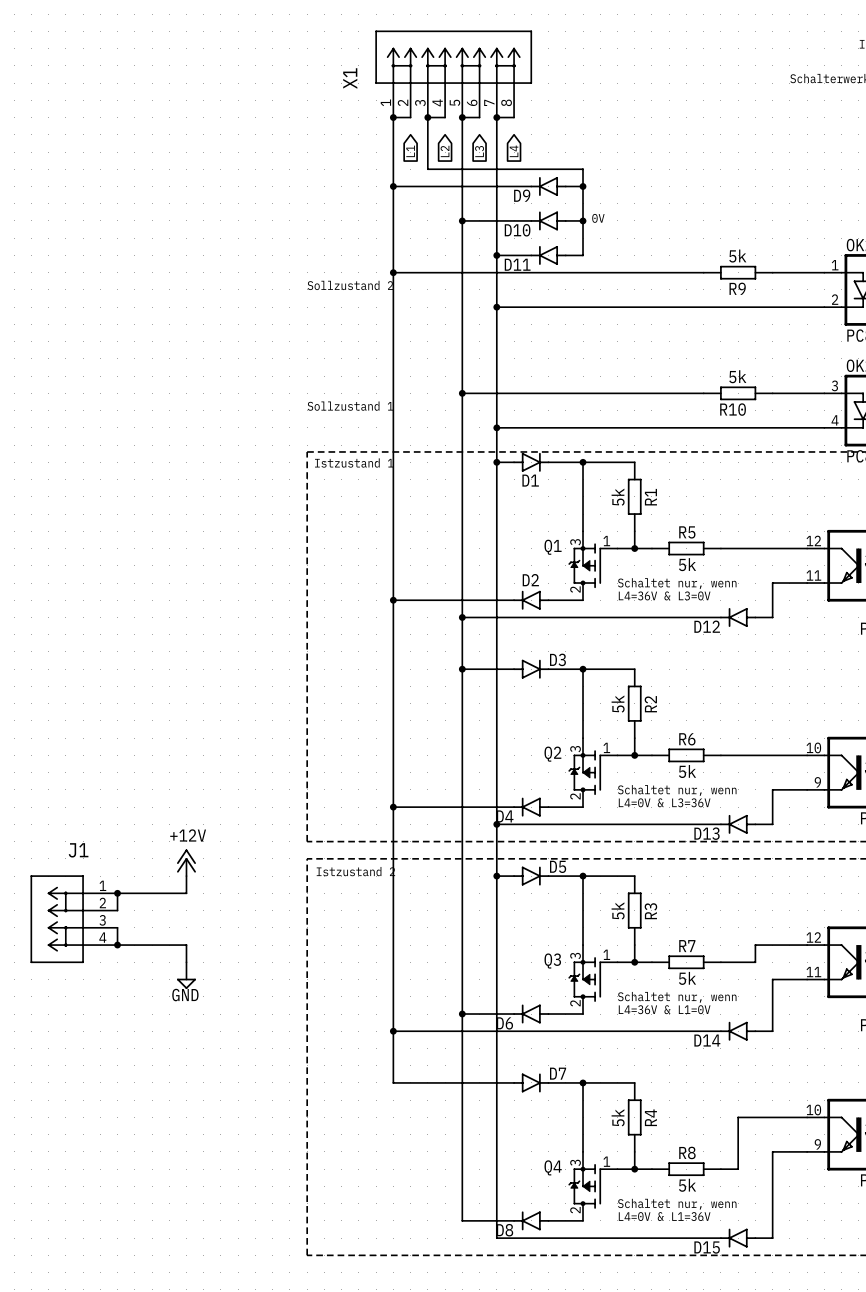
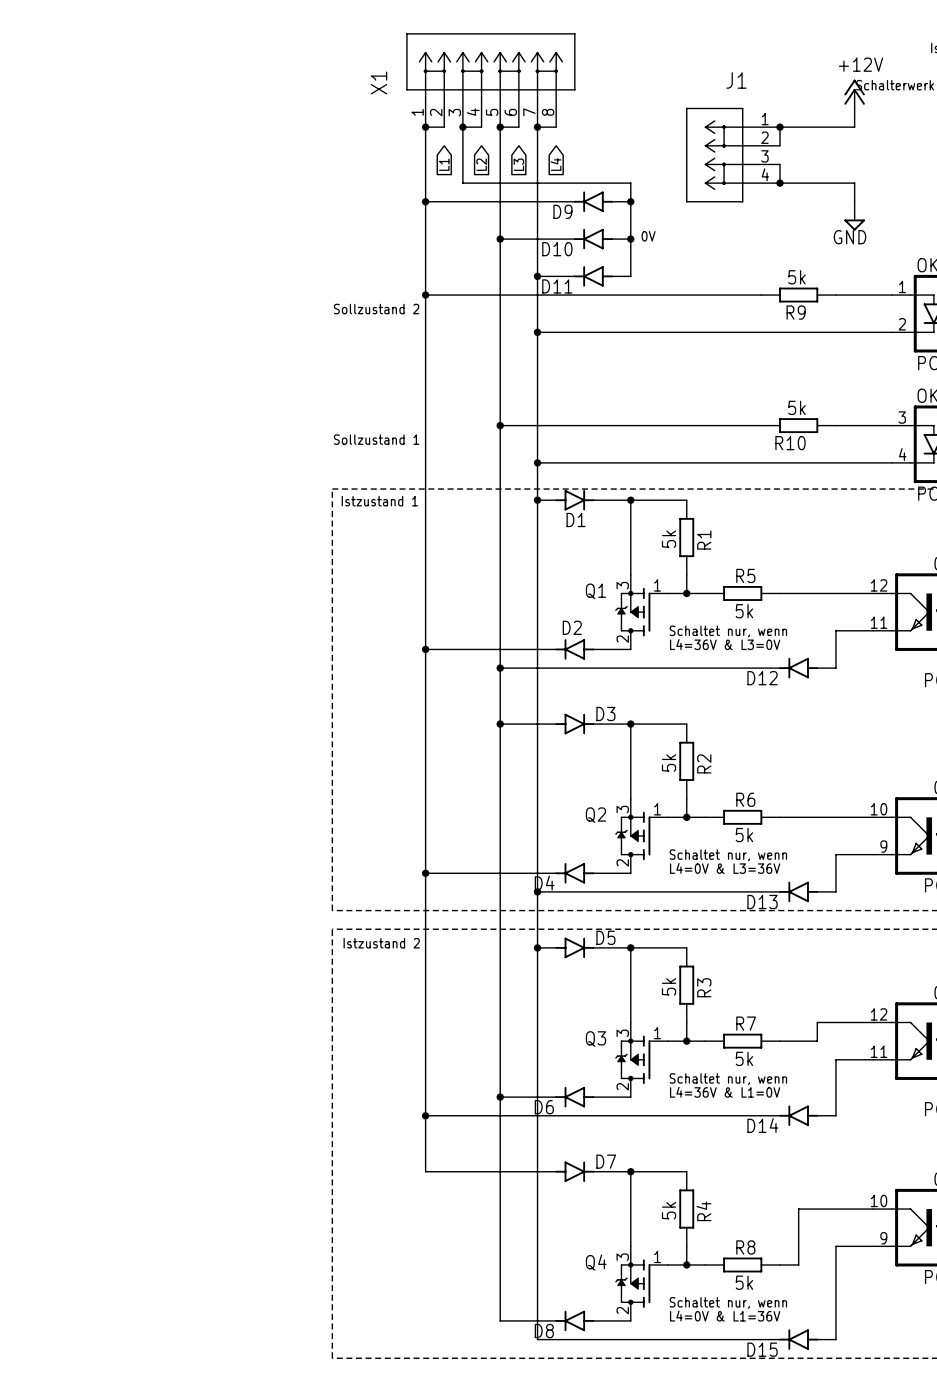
power symbol: none -> +12V (854, 94)
wire: none -> (854, 108) (854, 127) (780, 127) (780, 145)
junction: none -> (780, 127)
wire: none -> (780, 164) (780, 183) (854, 183) (854, 201)
junction: none -> (780, 183)
power symbol: none -> GND (854, 216)
power symbol: +12V (186, 862) -> none
wire: (186, 876) (186, 893) (117, 893) (117, 910) -> none
junction: (117, 893) -> none
J1 position: (74, 919) -> (733, 155)
wire: (117, 927) (117, 945) (186, 945) (186, 962) -> none
junction: (117, 945) -> none
power symbol: GND (186, 975) -> none

